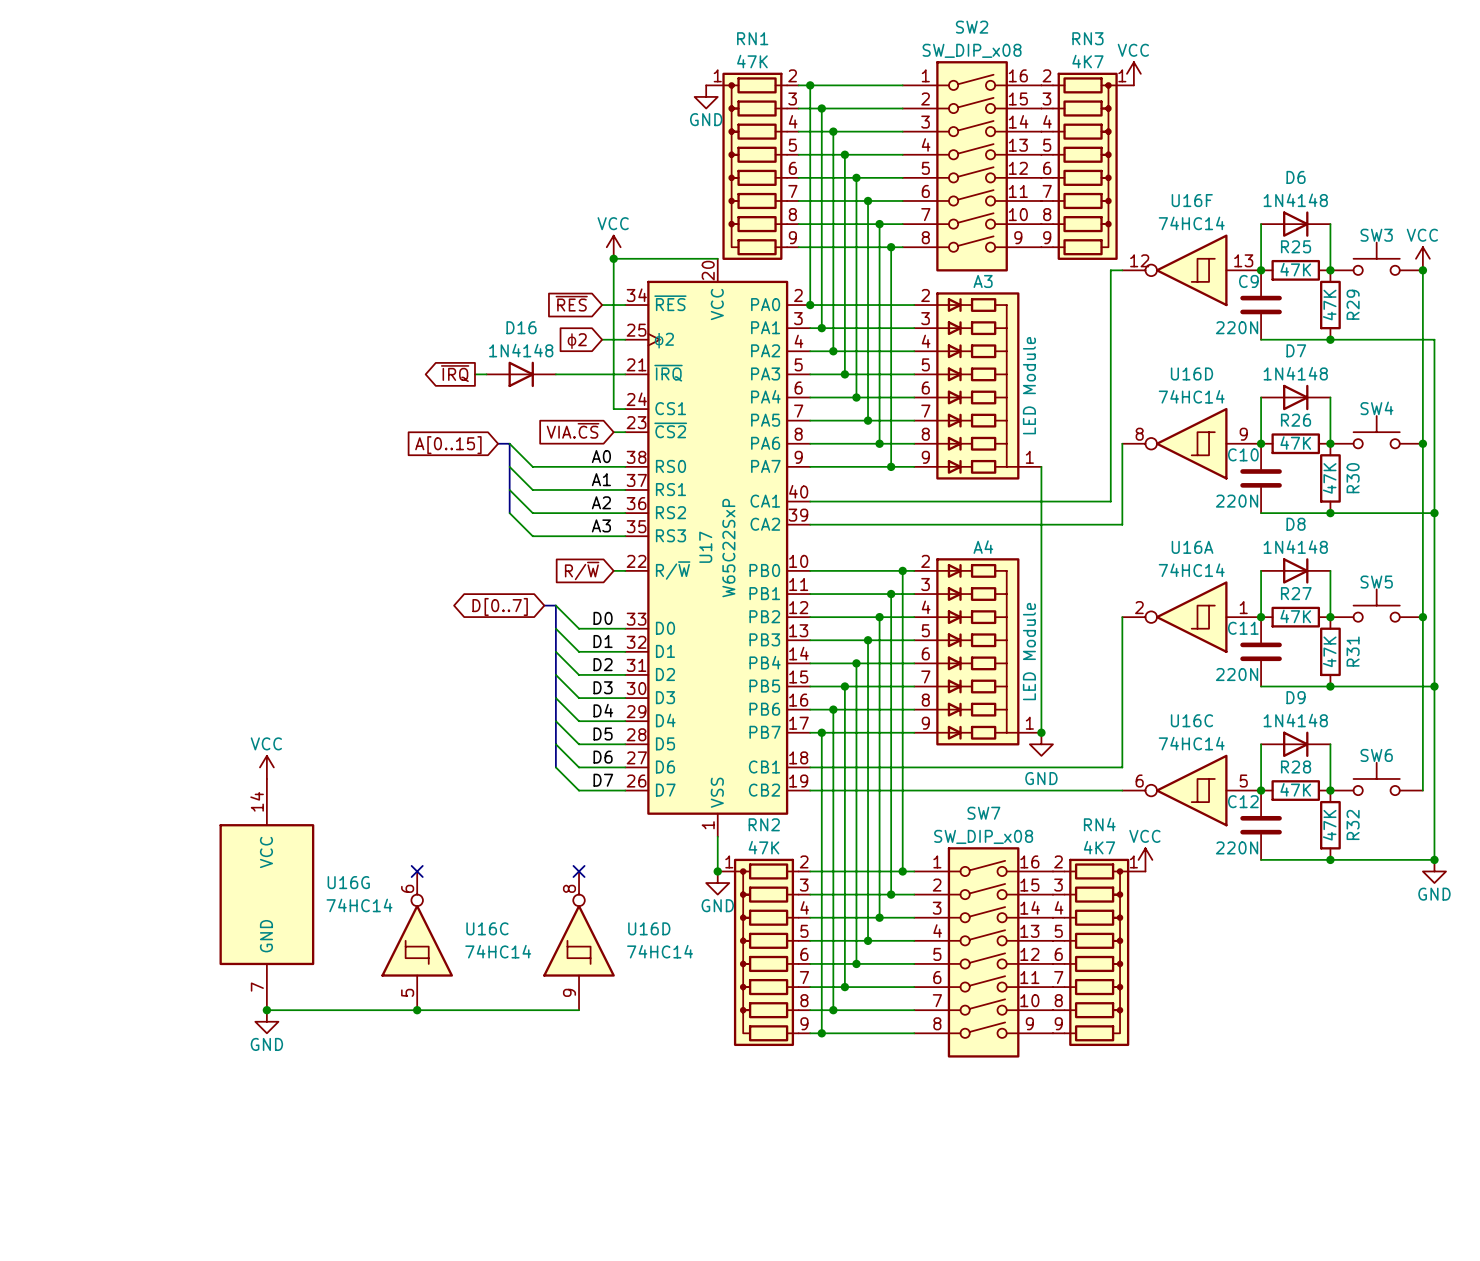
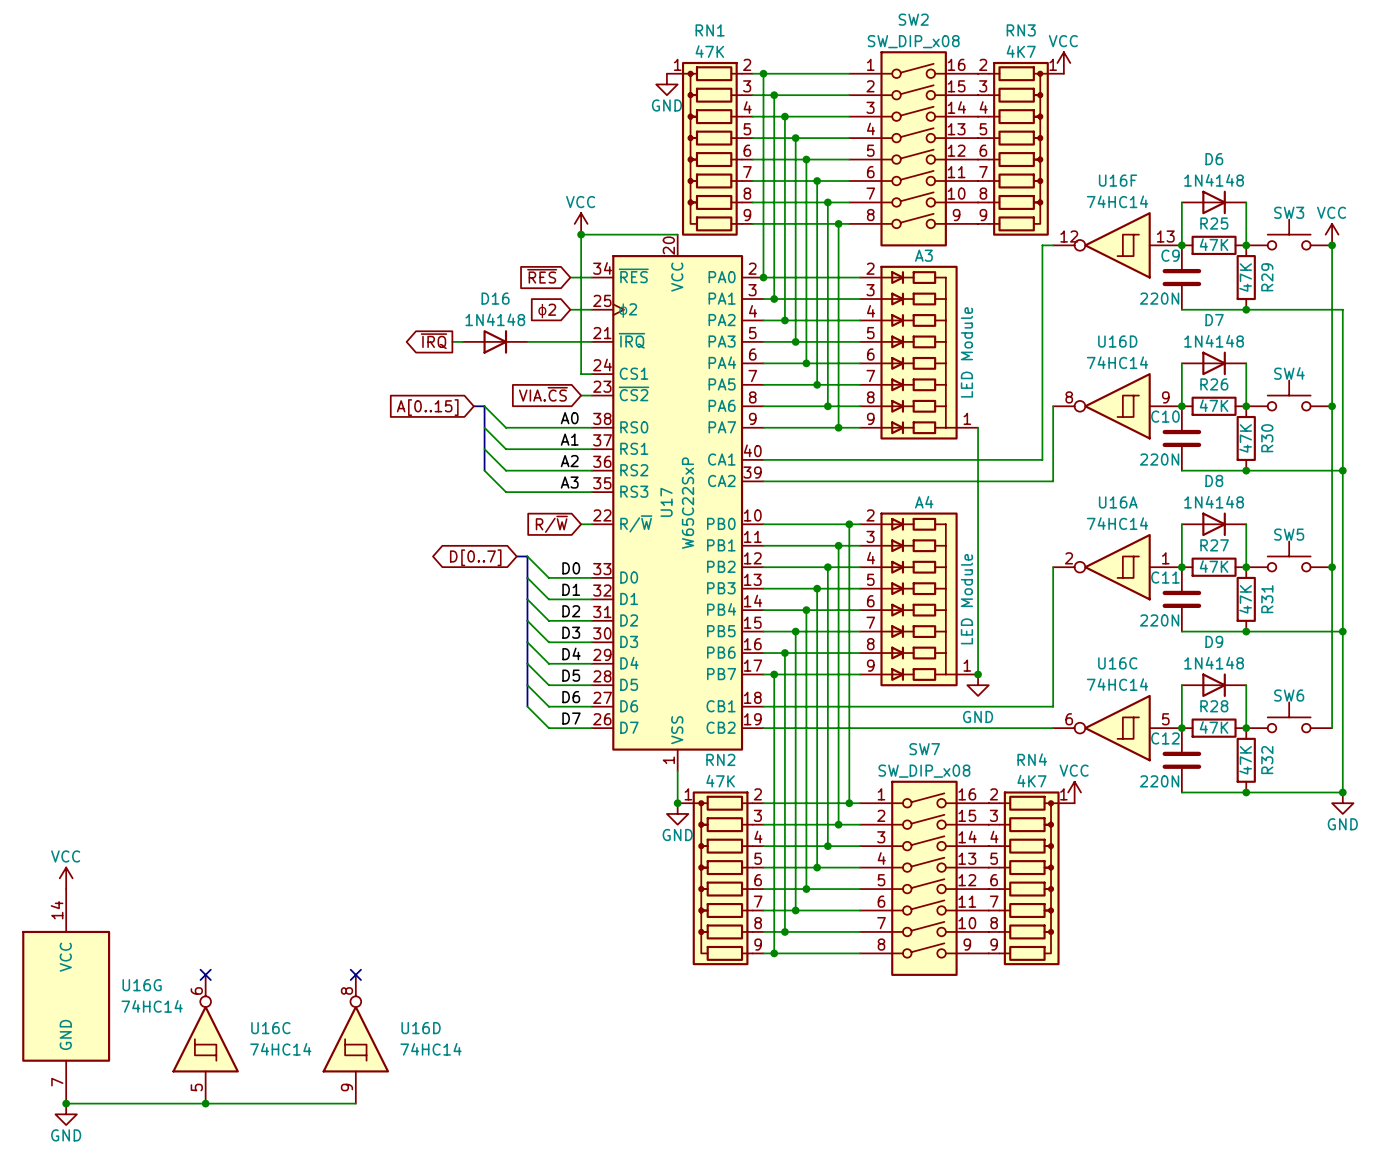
power symbol: VCC (266, 767) -> none
no-connect mark: (417, 871) -> none
no-connect mark: (579, 871) -> none
U16G position: (266, 894) -> (66, 996)
U16C: 74HC14 (417, 940) -> none
U16D: 74HC14 (579, 940) -> none
power symbol: none -> VCC (66, 878)
wire: (266, 1010) (579, 1010) -> none
junction: (266, 1010) -> none
junction: (417, 1010) -> none
power symbol: GND (266, 1021) -> none
no-connect mark: none -> (205, 974)
no-connect mark: none -> (355, 974)
U16C: none -> 74HC14 (205, 1039)
U16D: none -> 74HC14 (355, 1039)
wire: none -> (66, 1103) (355, 1103)
junction: none -> (66, 1103)
junction: none -> (205, 1103)
power symbol: none -> GND (66, 1114)

